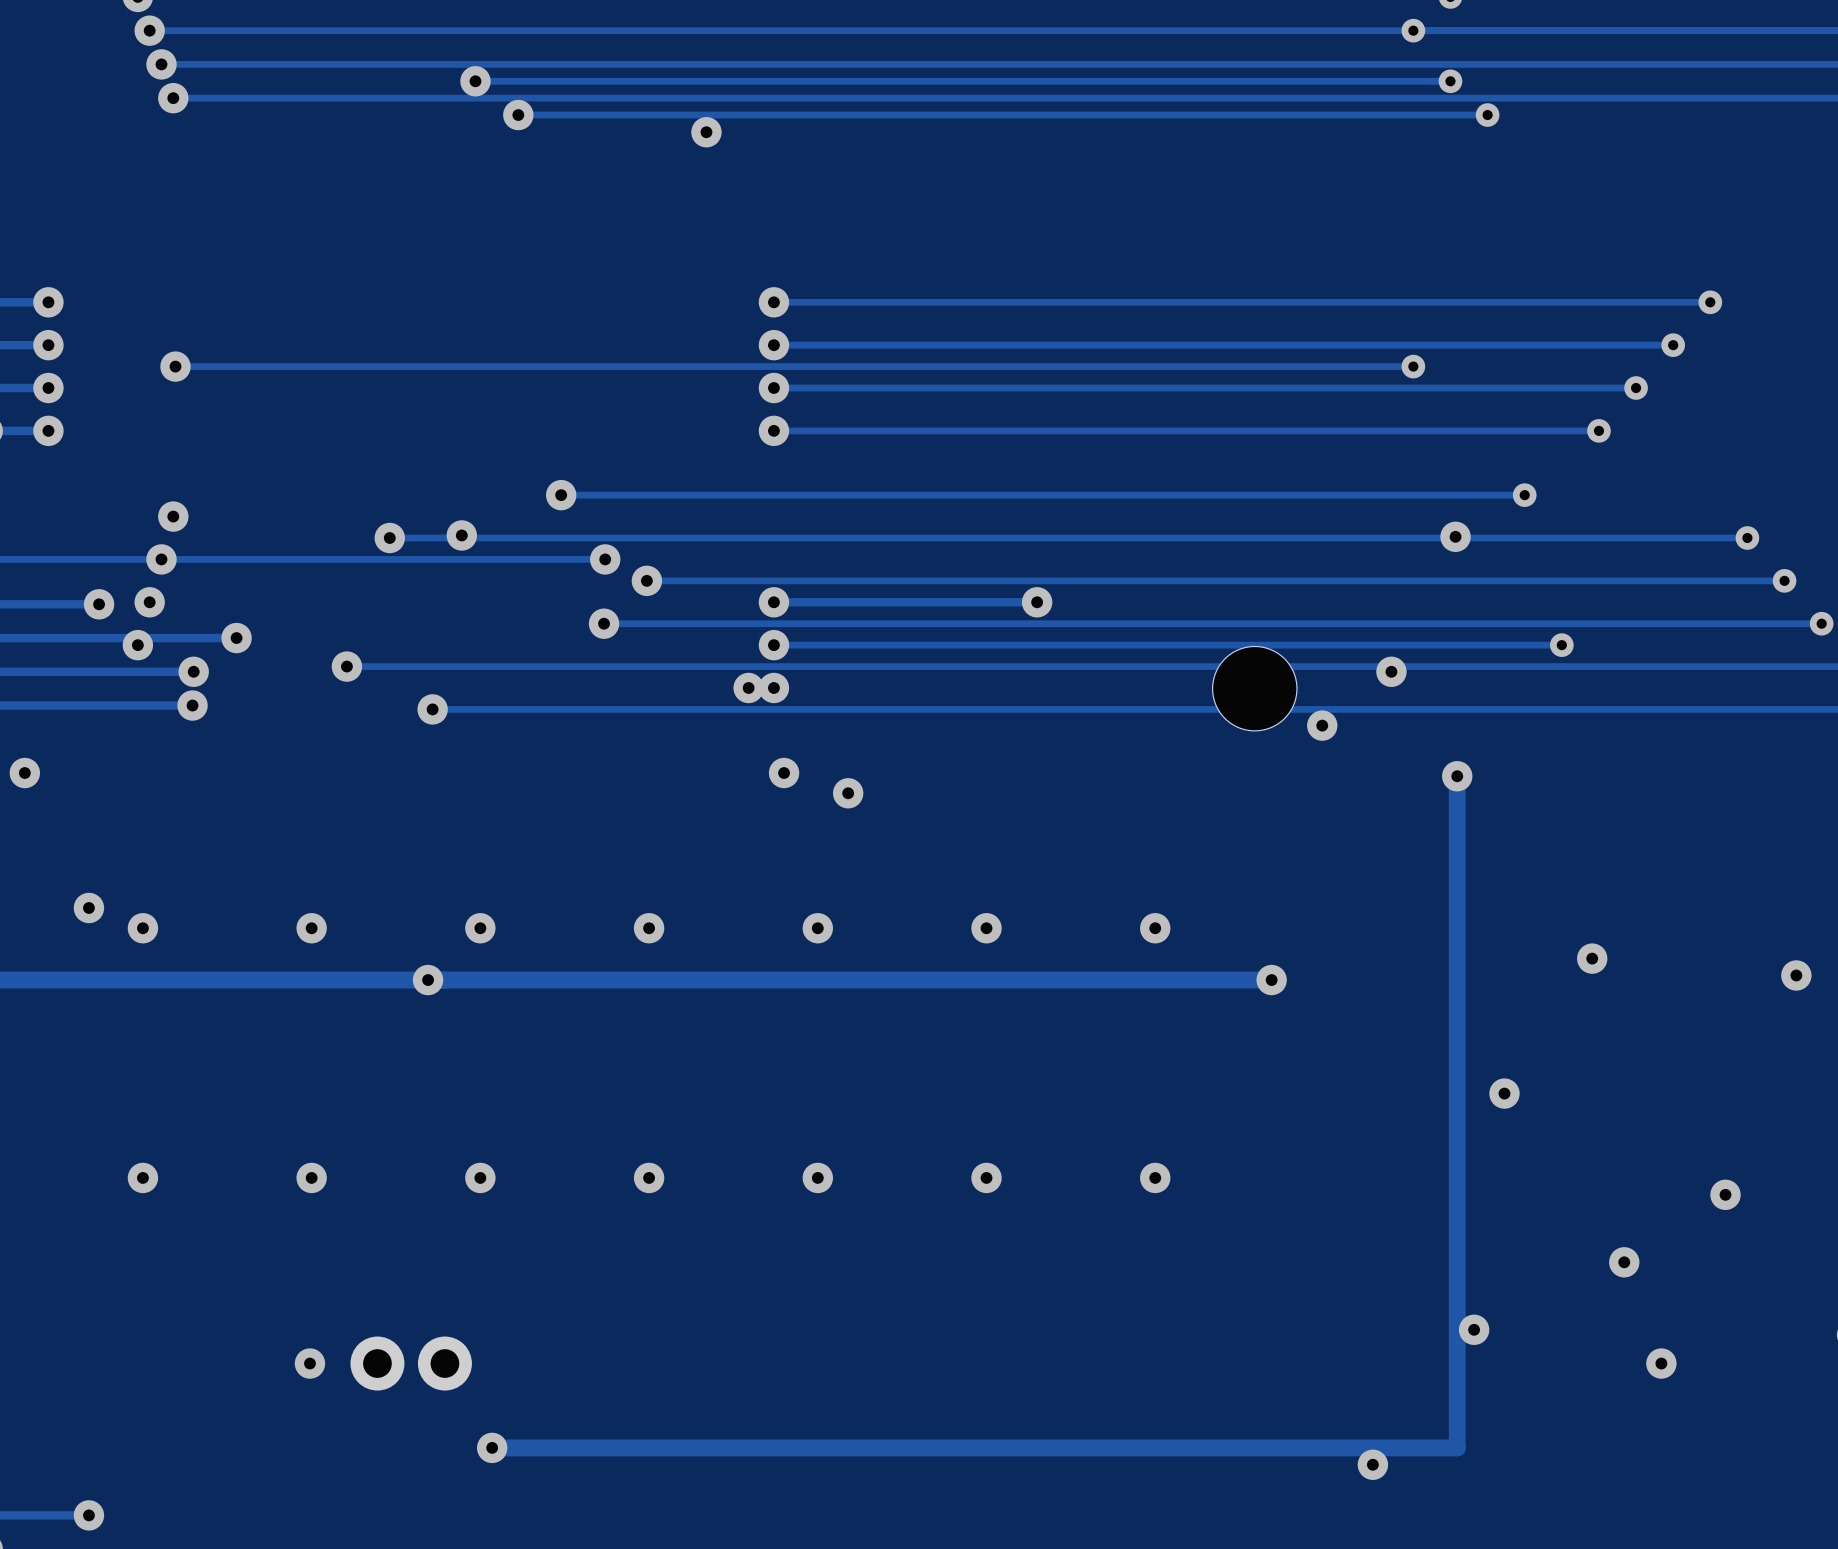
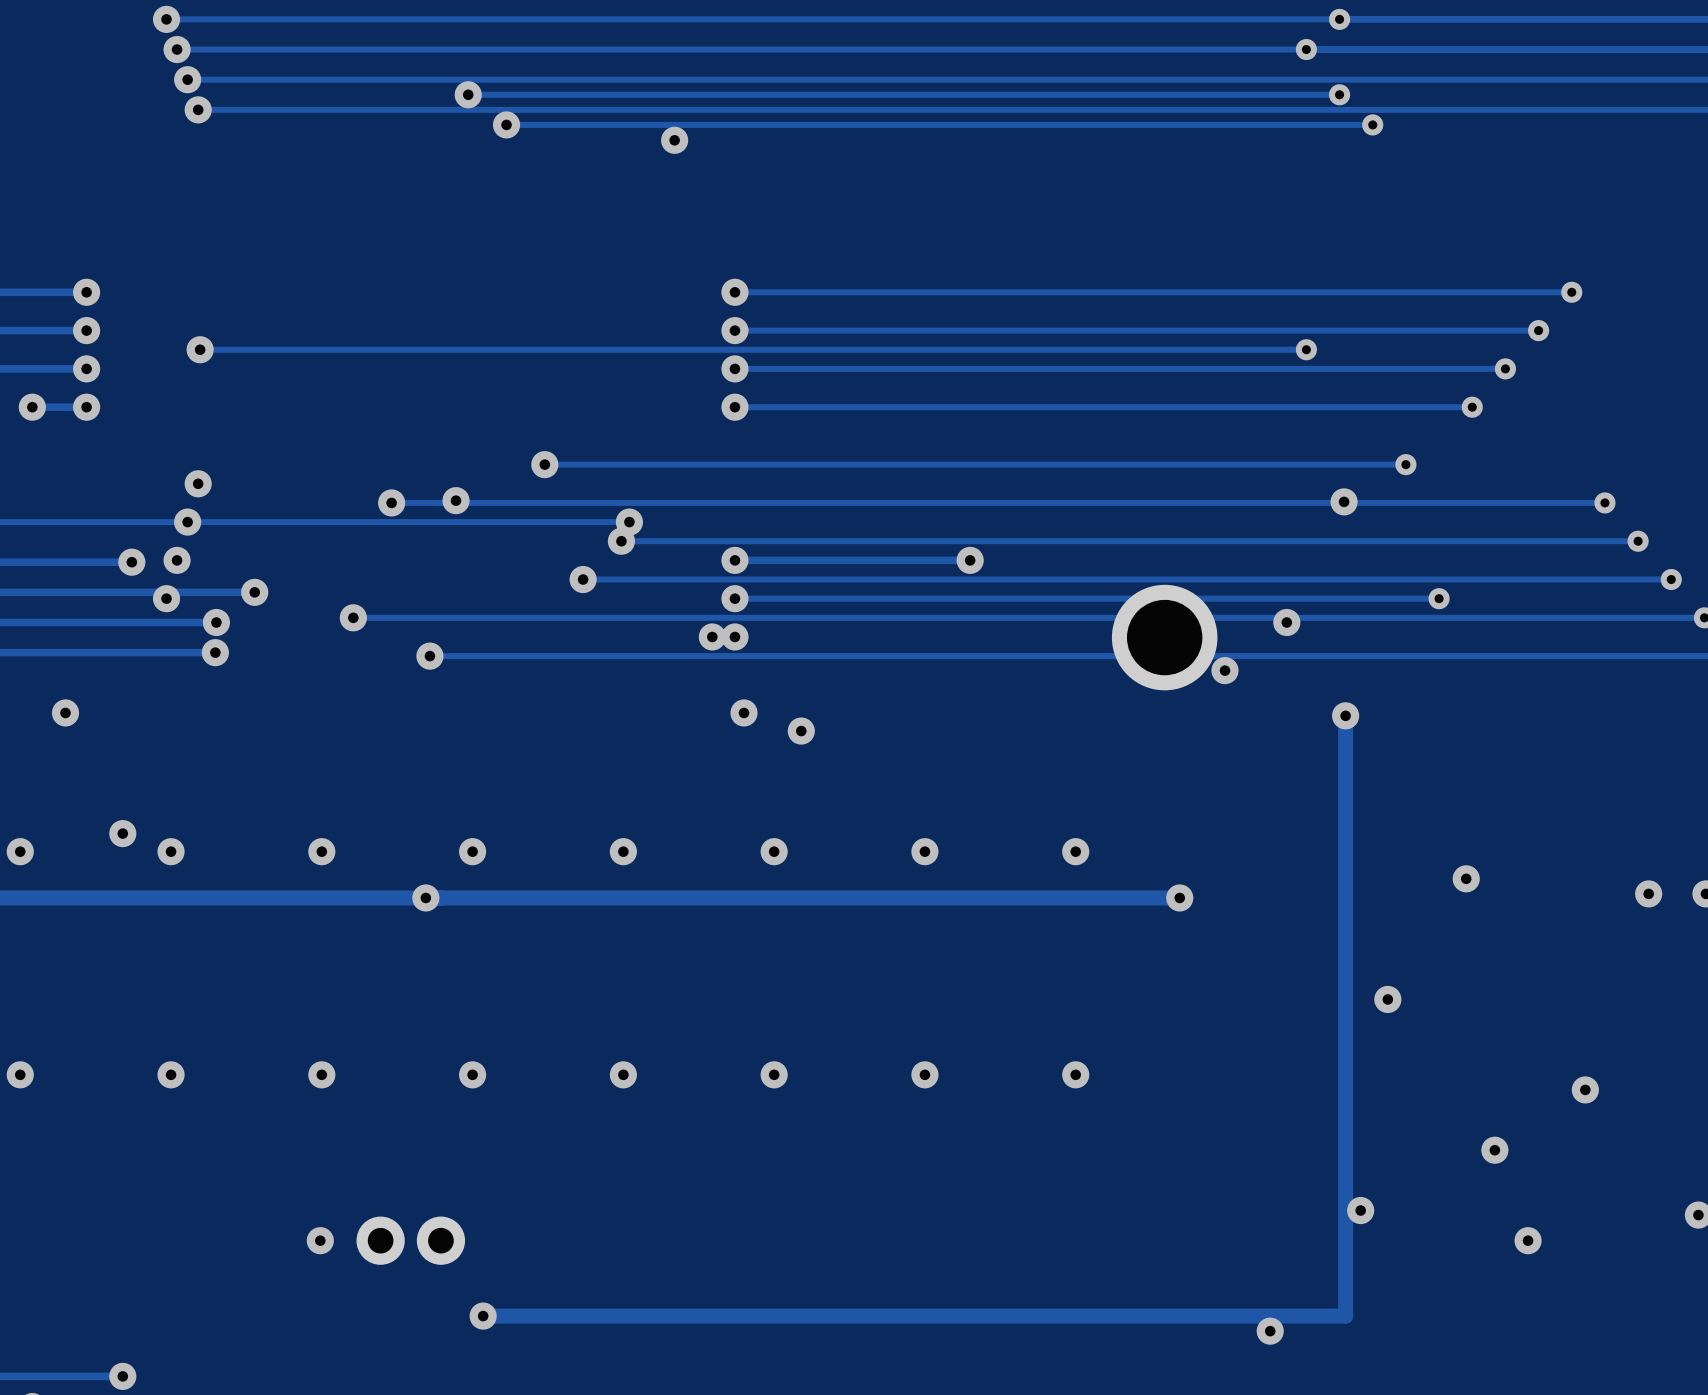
track: none -> (584, 522) (629, 522)
via position: (605, 559) -> (629, 522)
part footprint: [1212, 646, 1297, 731] -> [1111, 584, 1218, 691]

